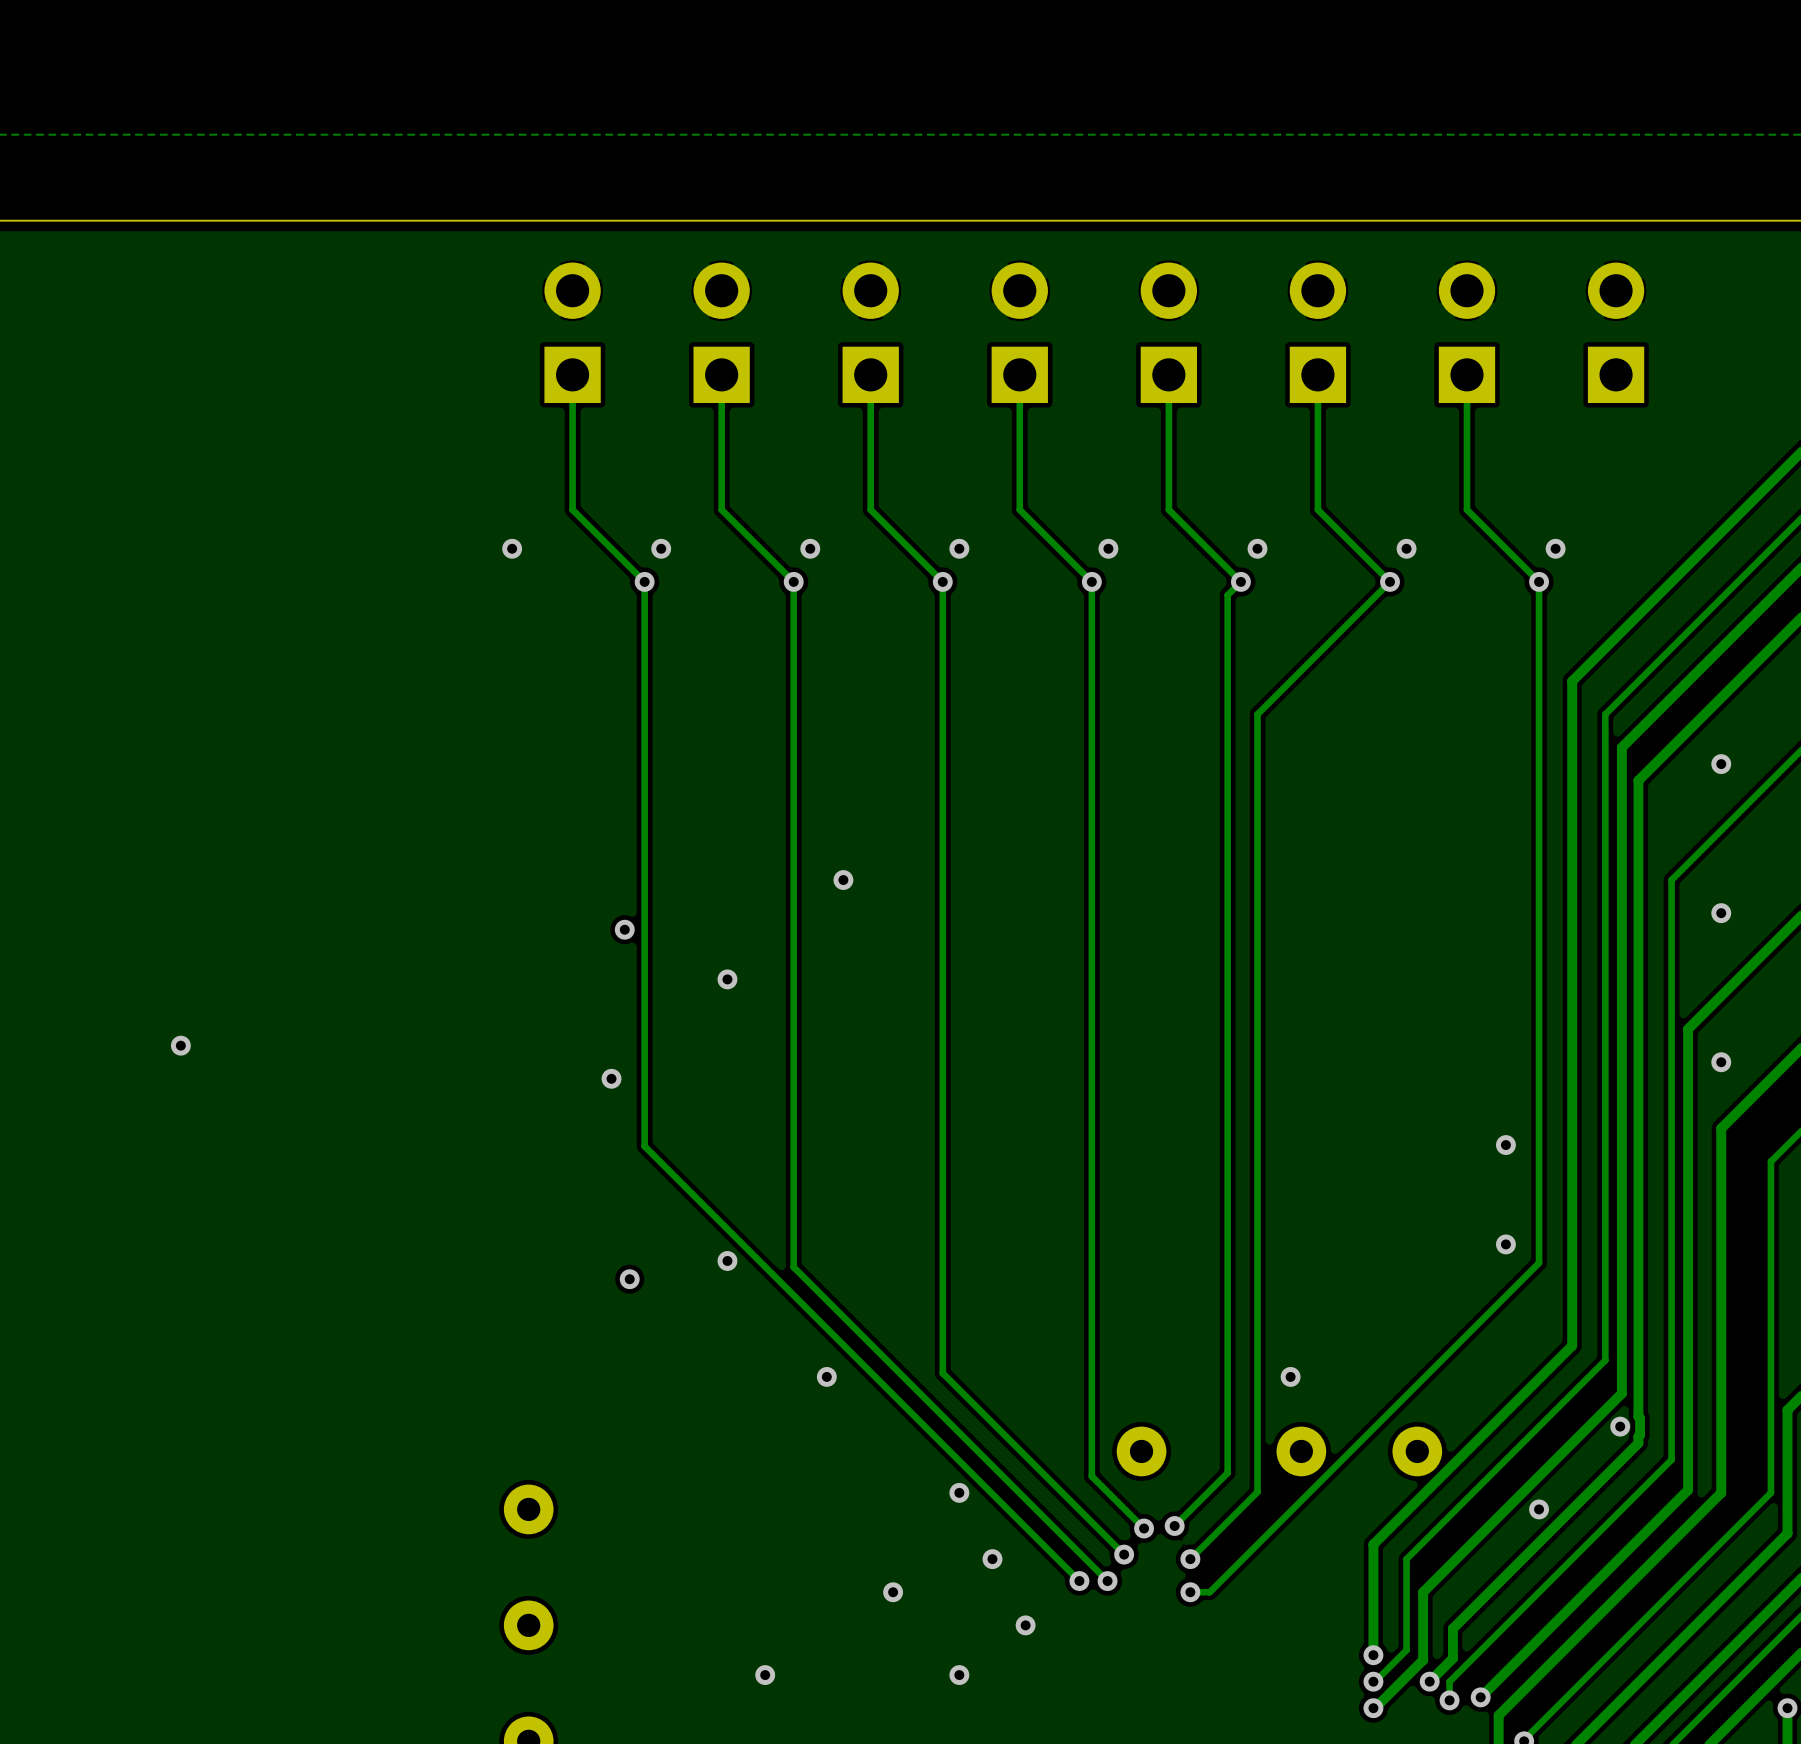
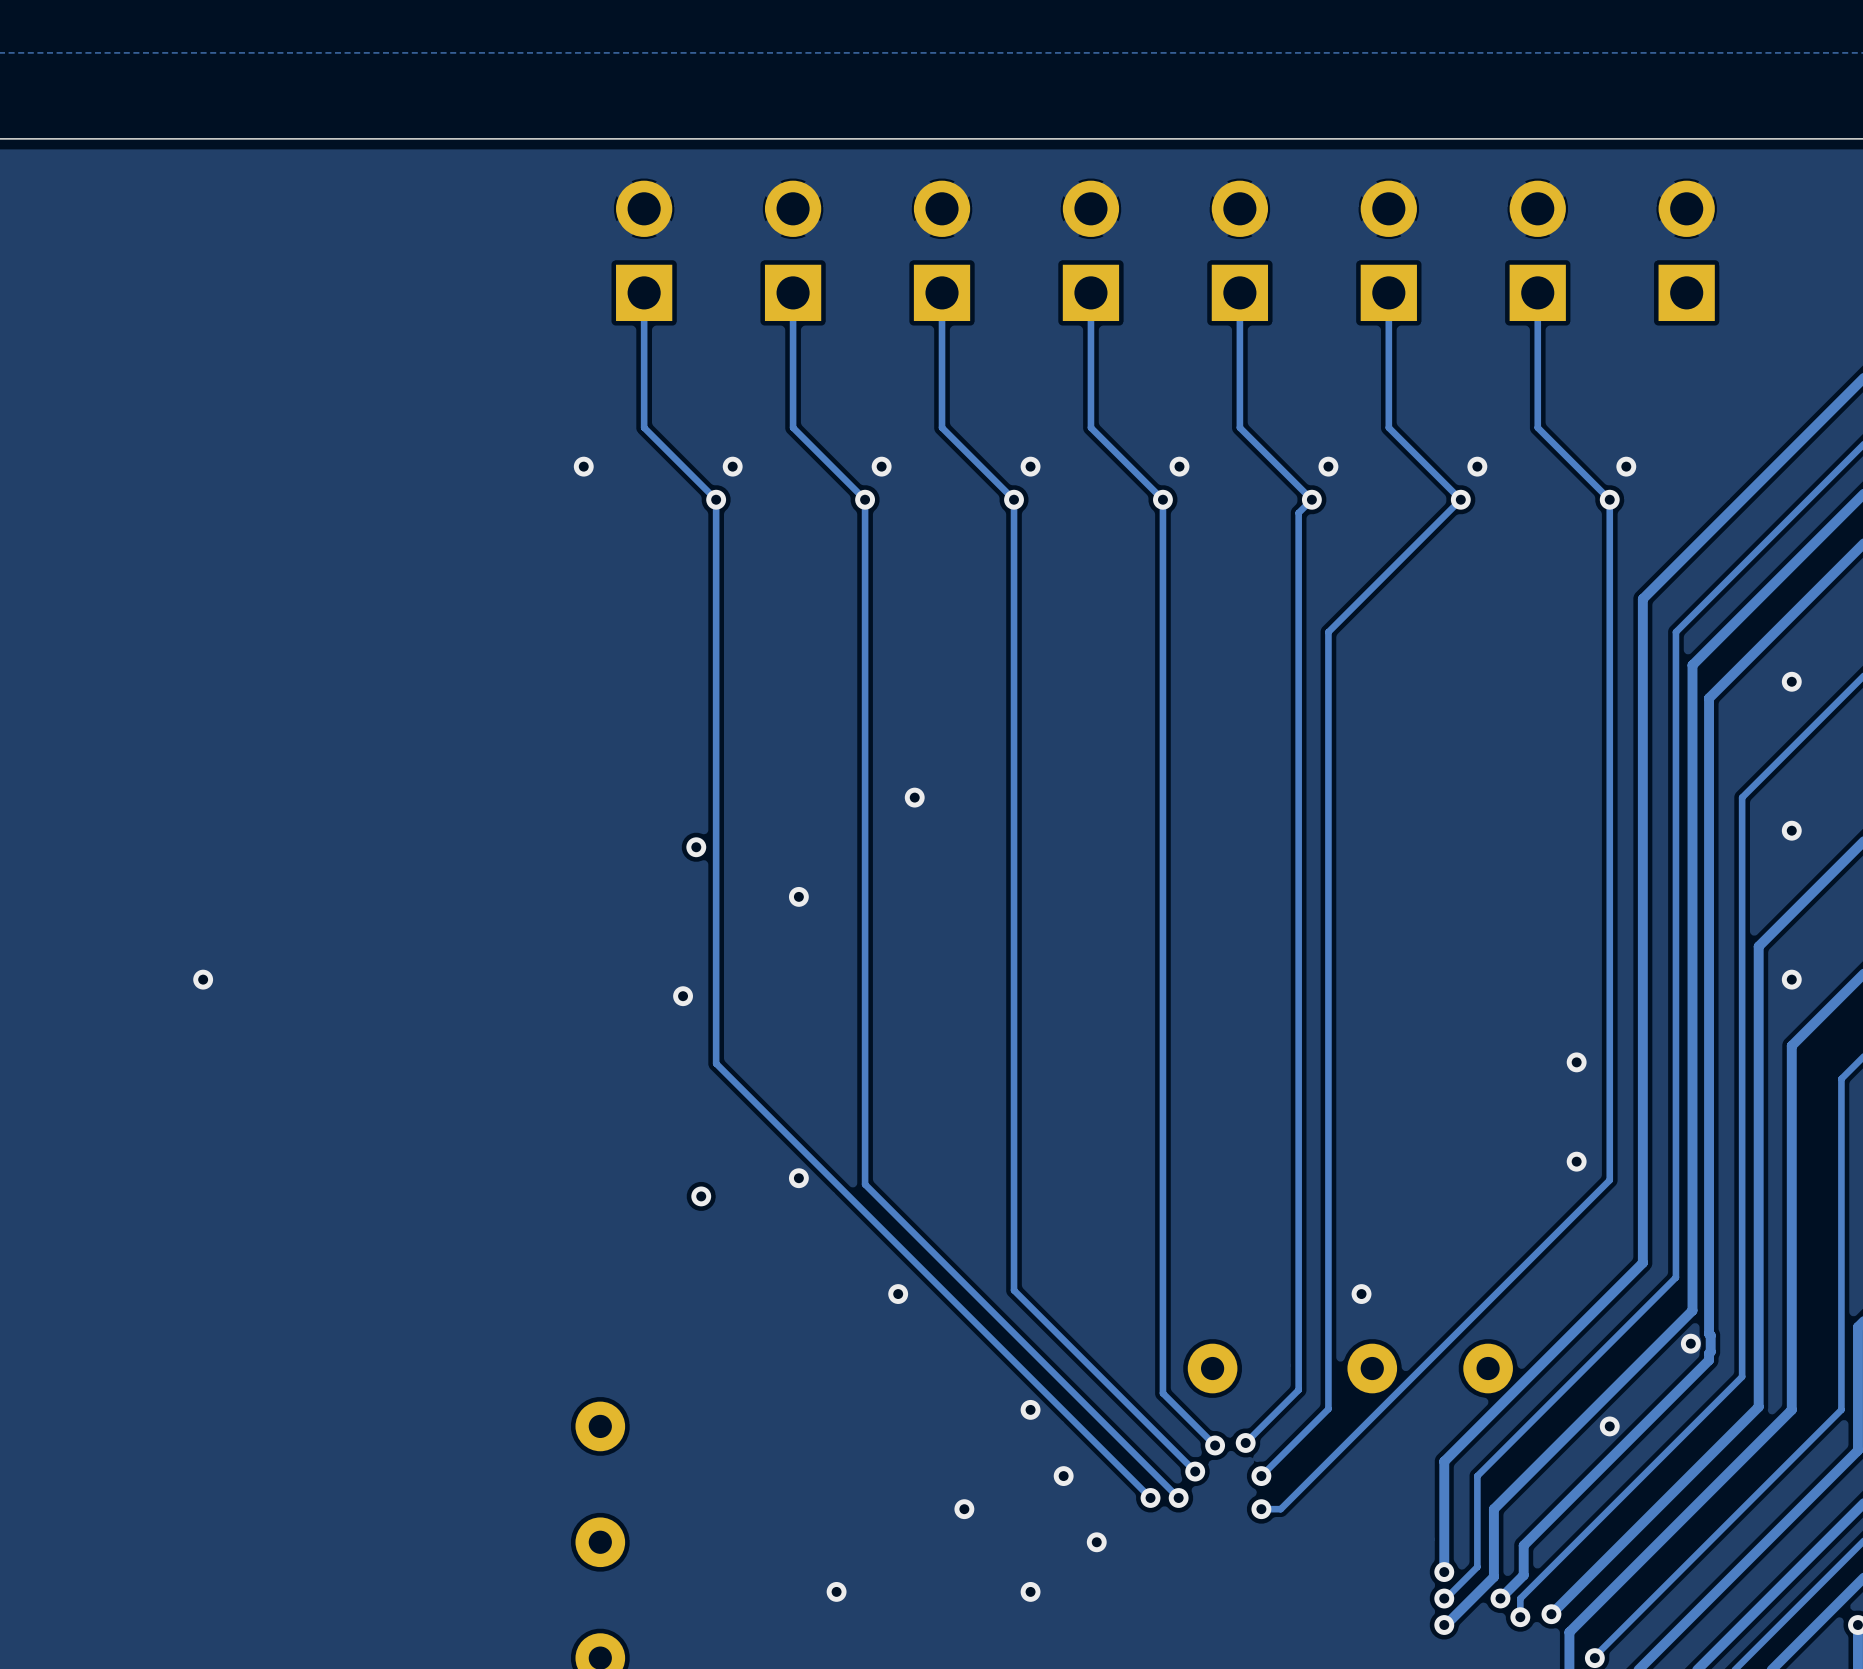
via position: (180, 1045) -> (203, 979)

